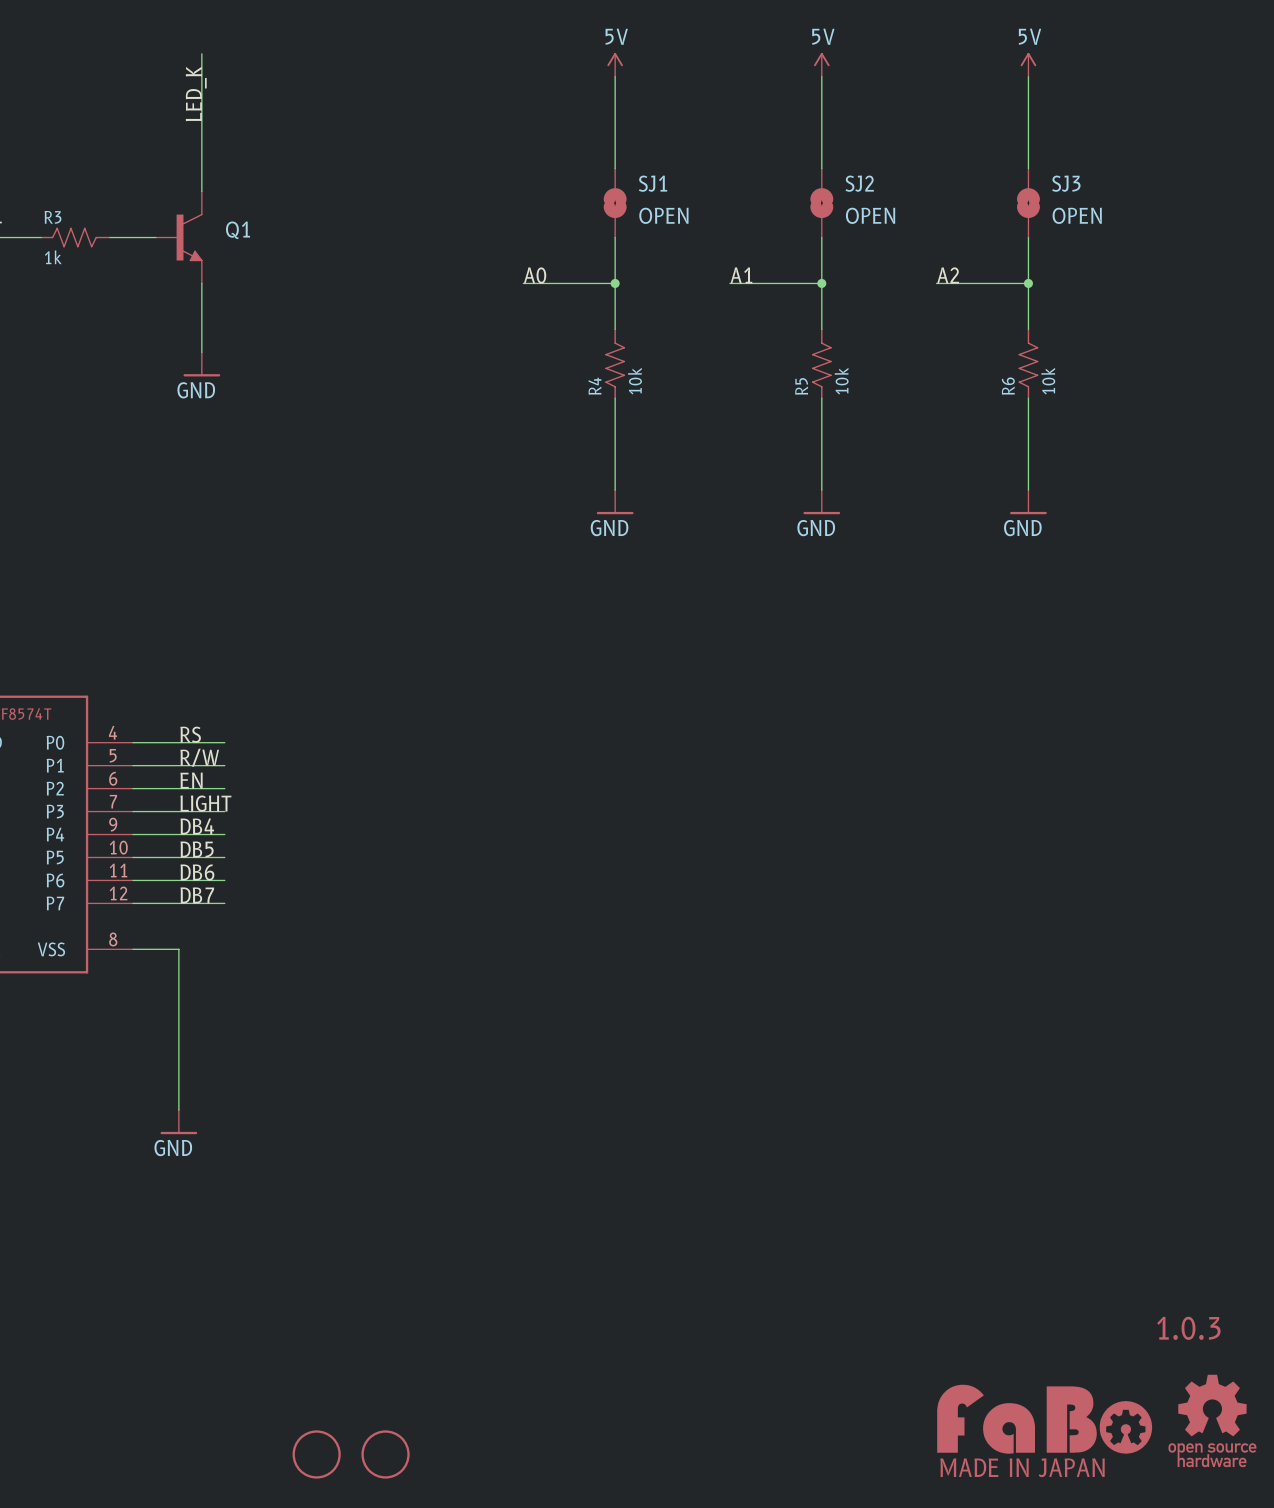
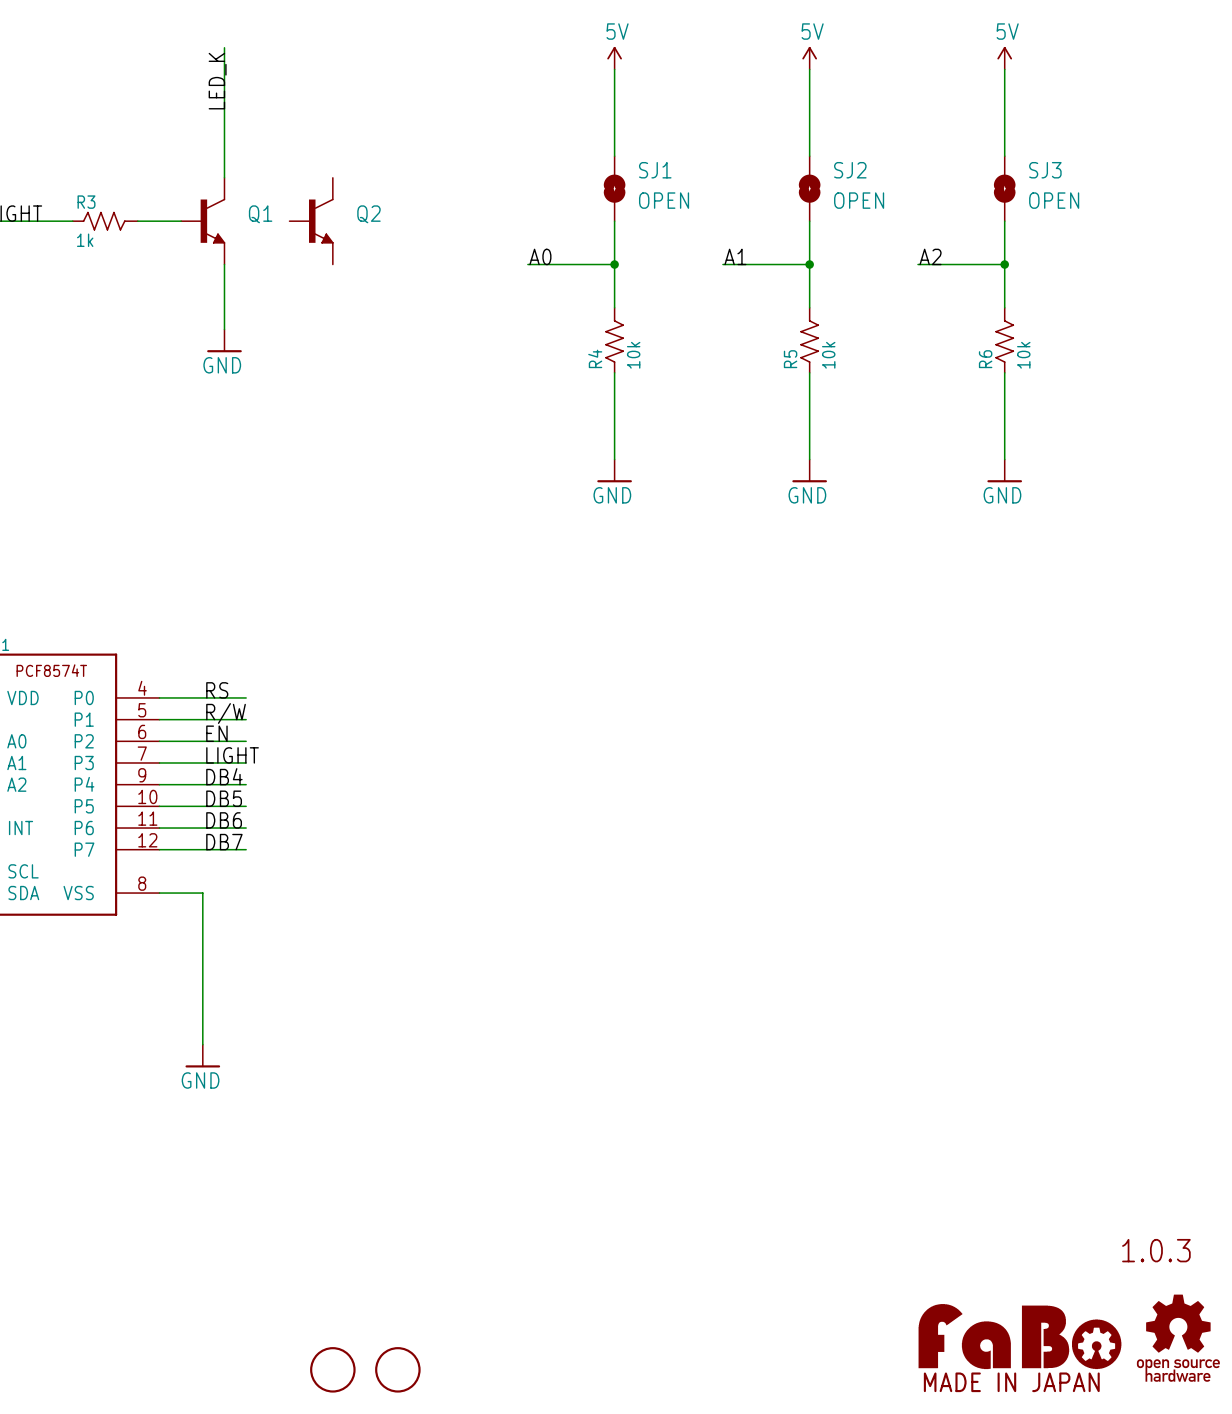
Q2: none -> (311, 221)

